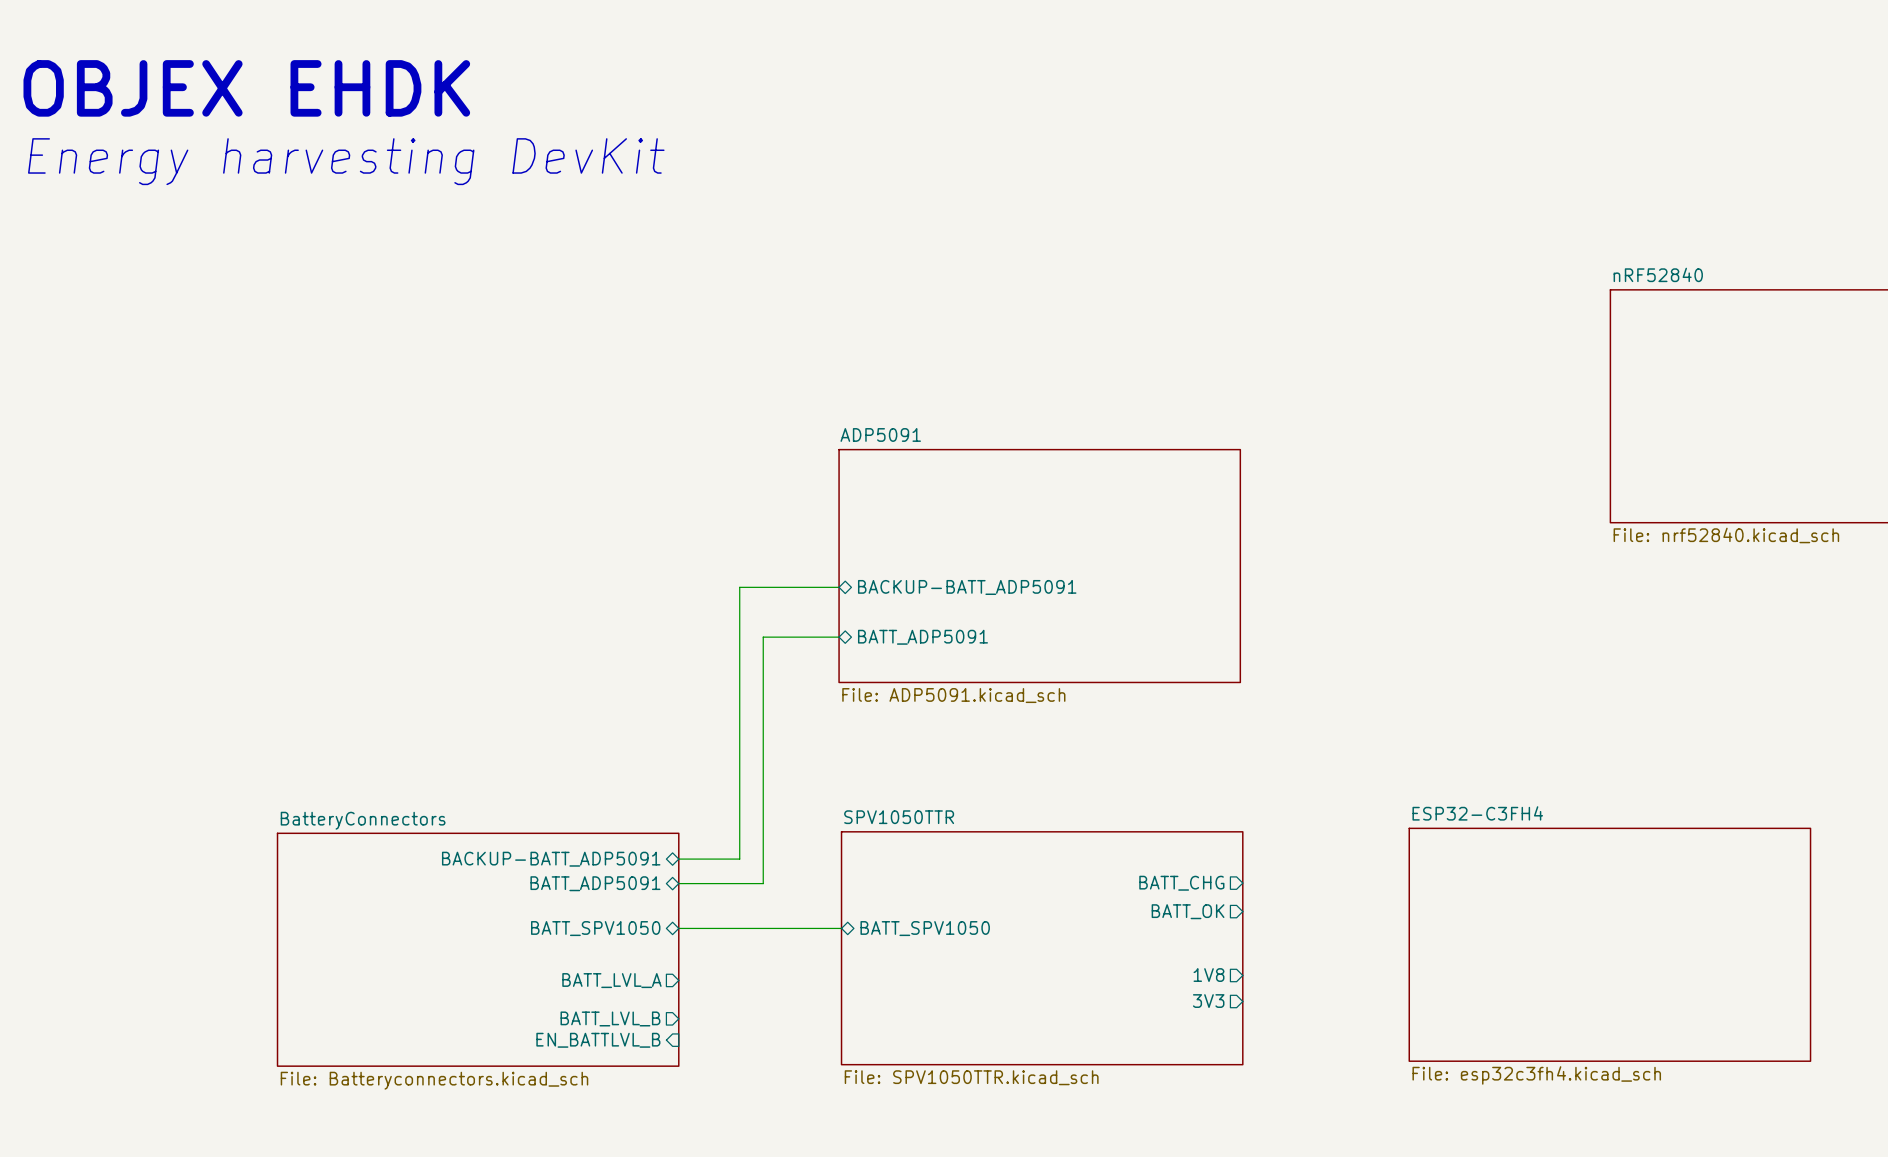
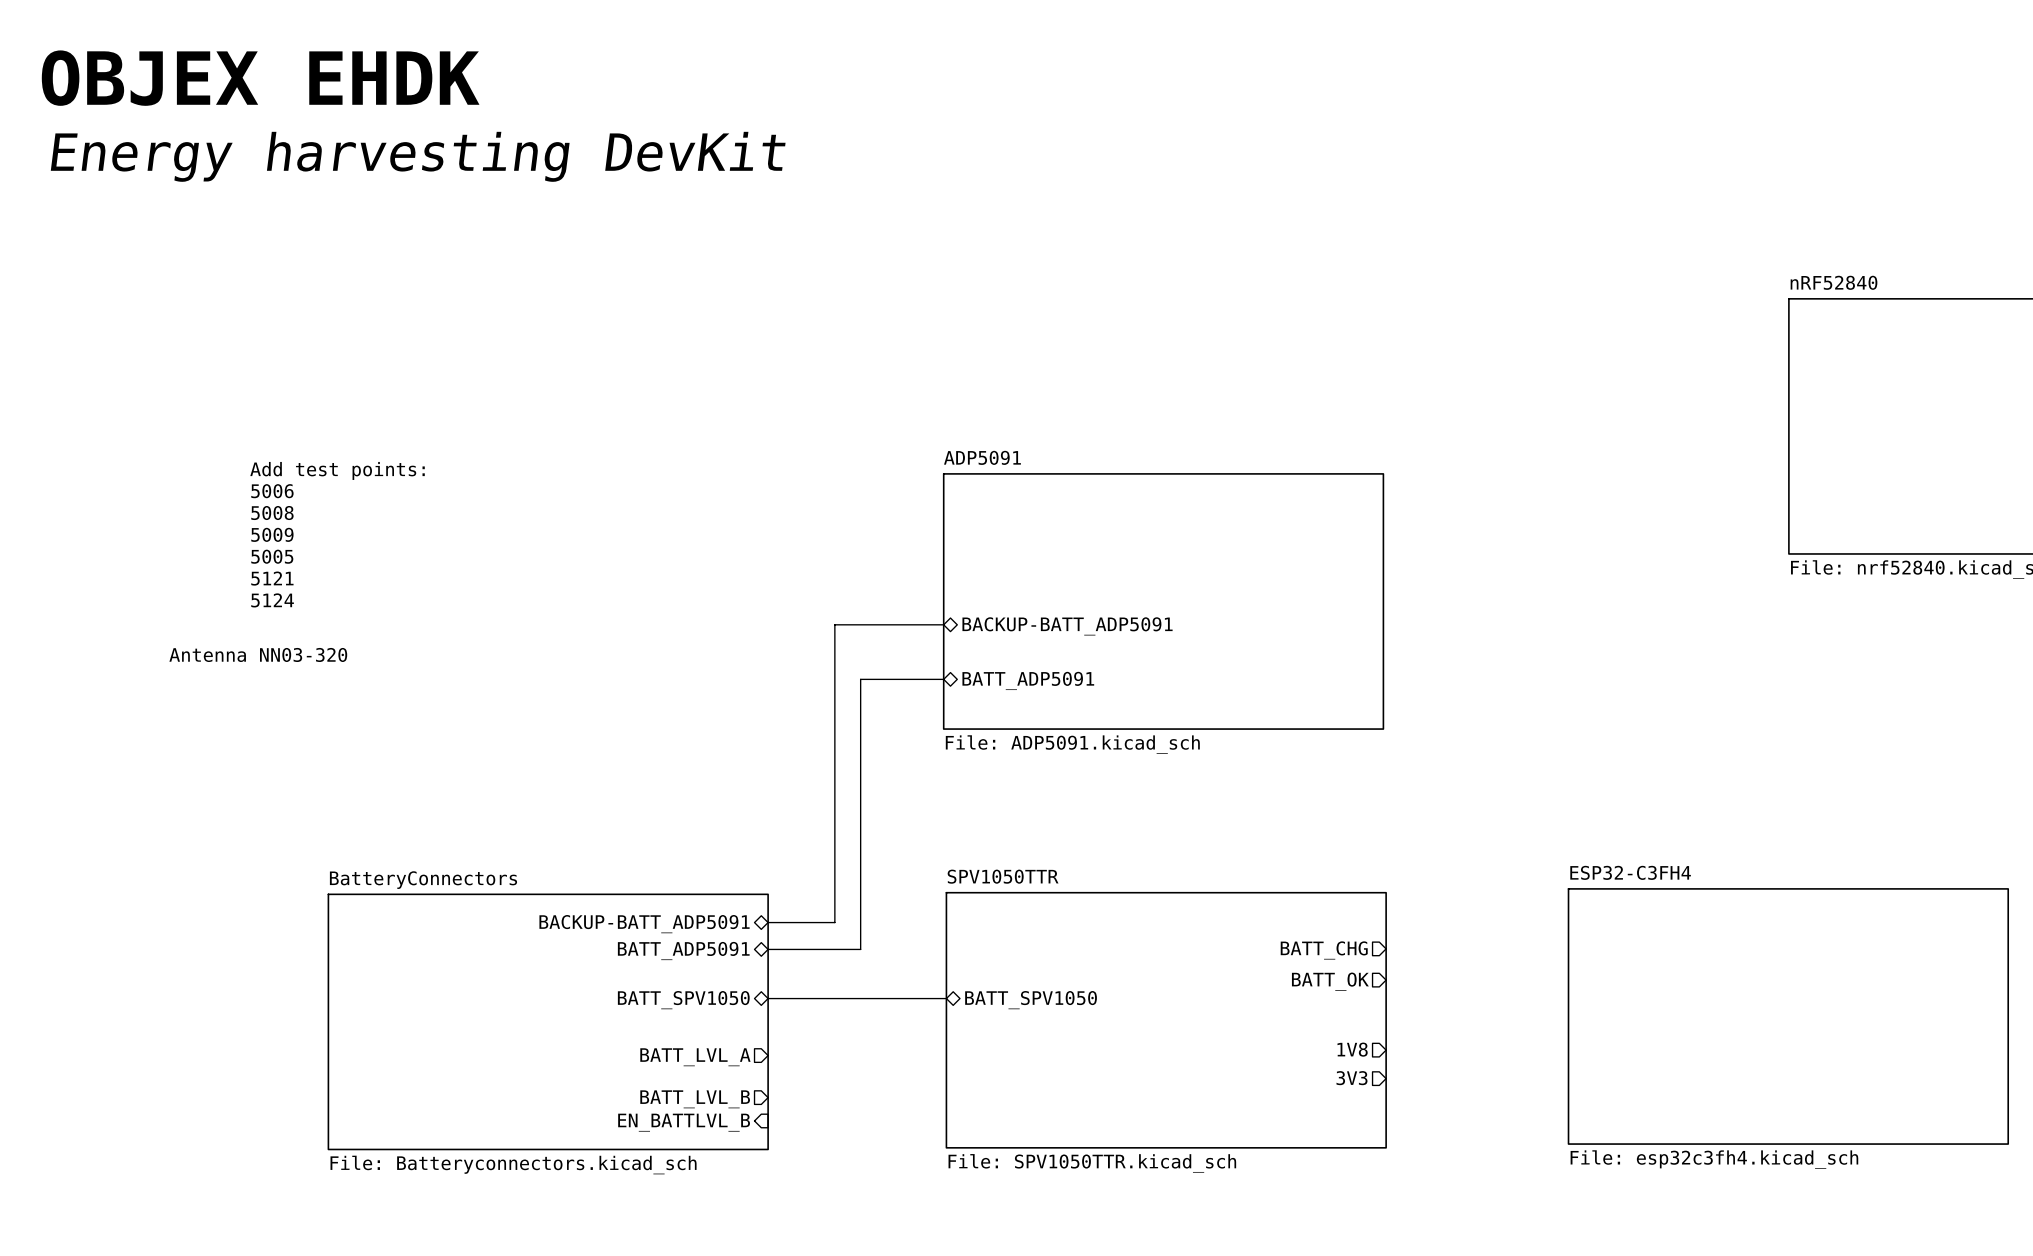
text: none -> Add test points: (337, 470)
text: none -> 5006 (272, 491)
text: none -> 5008 (272, 513)
text: none -> 5009 (272, 534)
text: none -> 5005 (272, 556)
text: none -> 5121 (272, 578)
text: none -> 5124 (272, 600)
text: none -> Antenna NN03-320 (258, 654)

